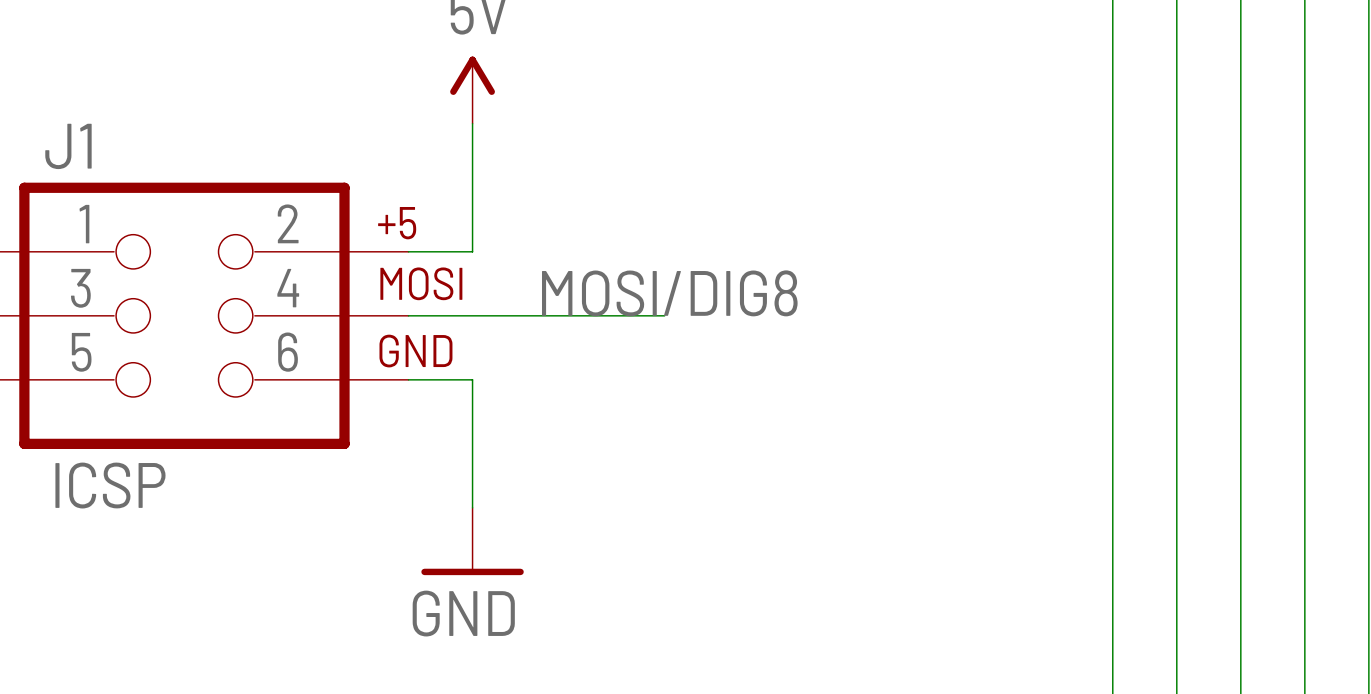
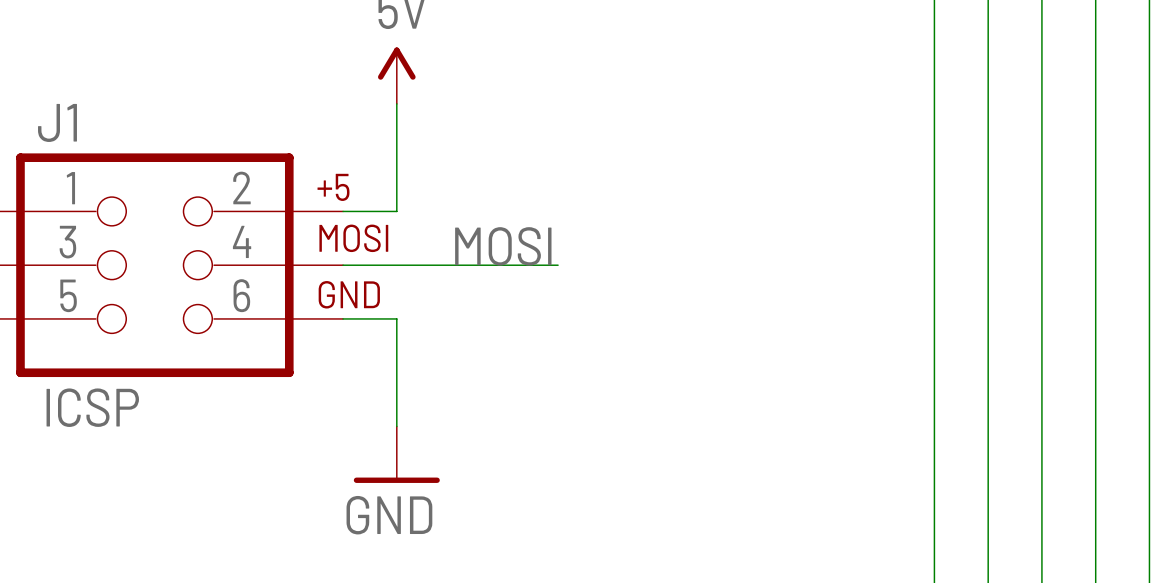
label: MOSI/DIG8 (669, 293) -> MOSI (503, 246)

